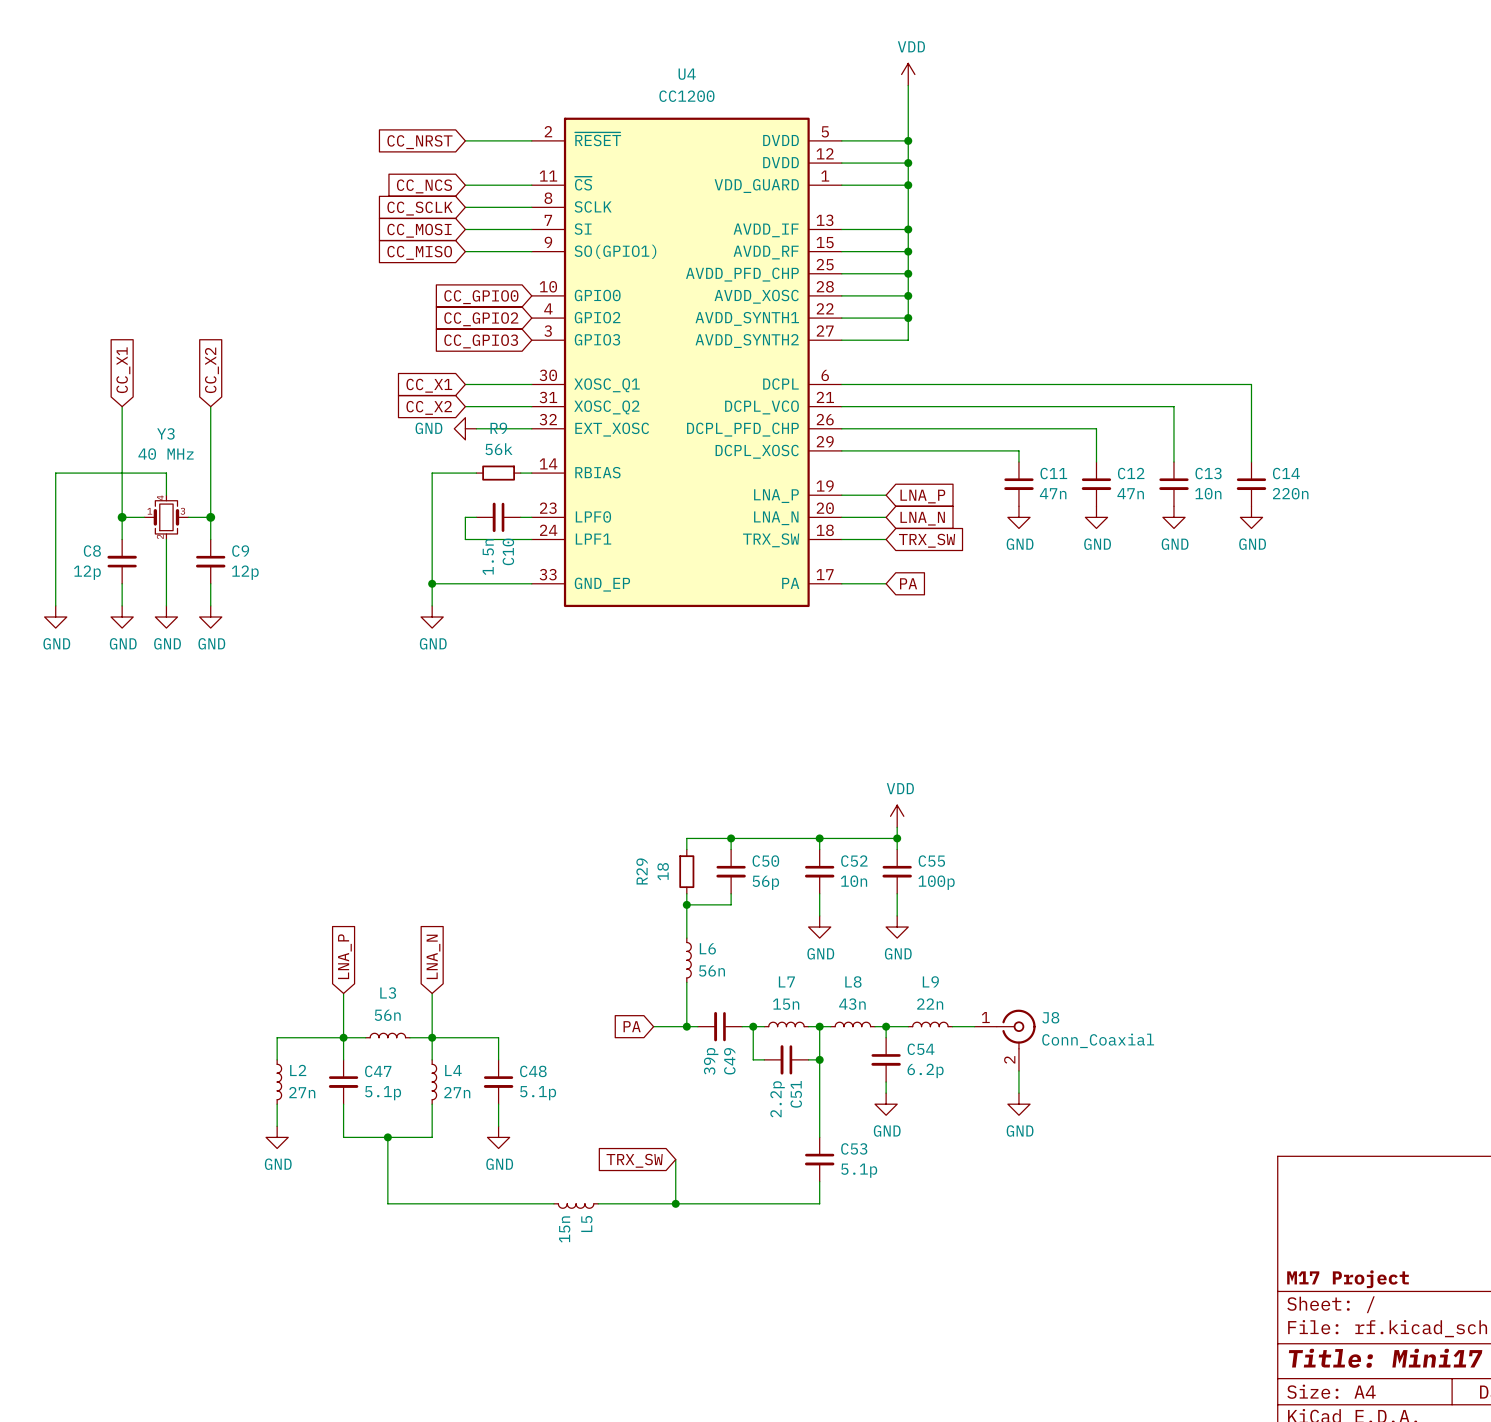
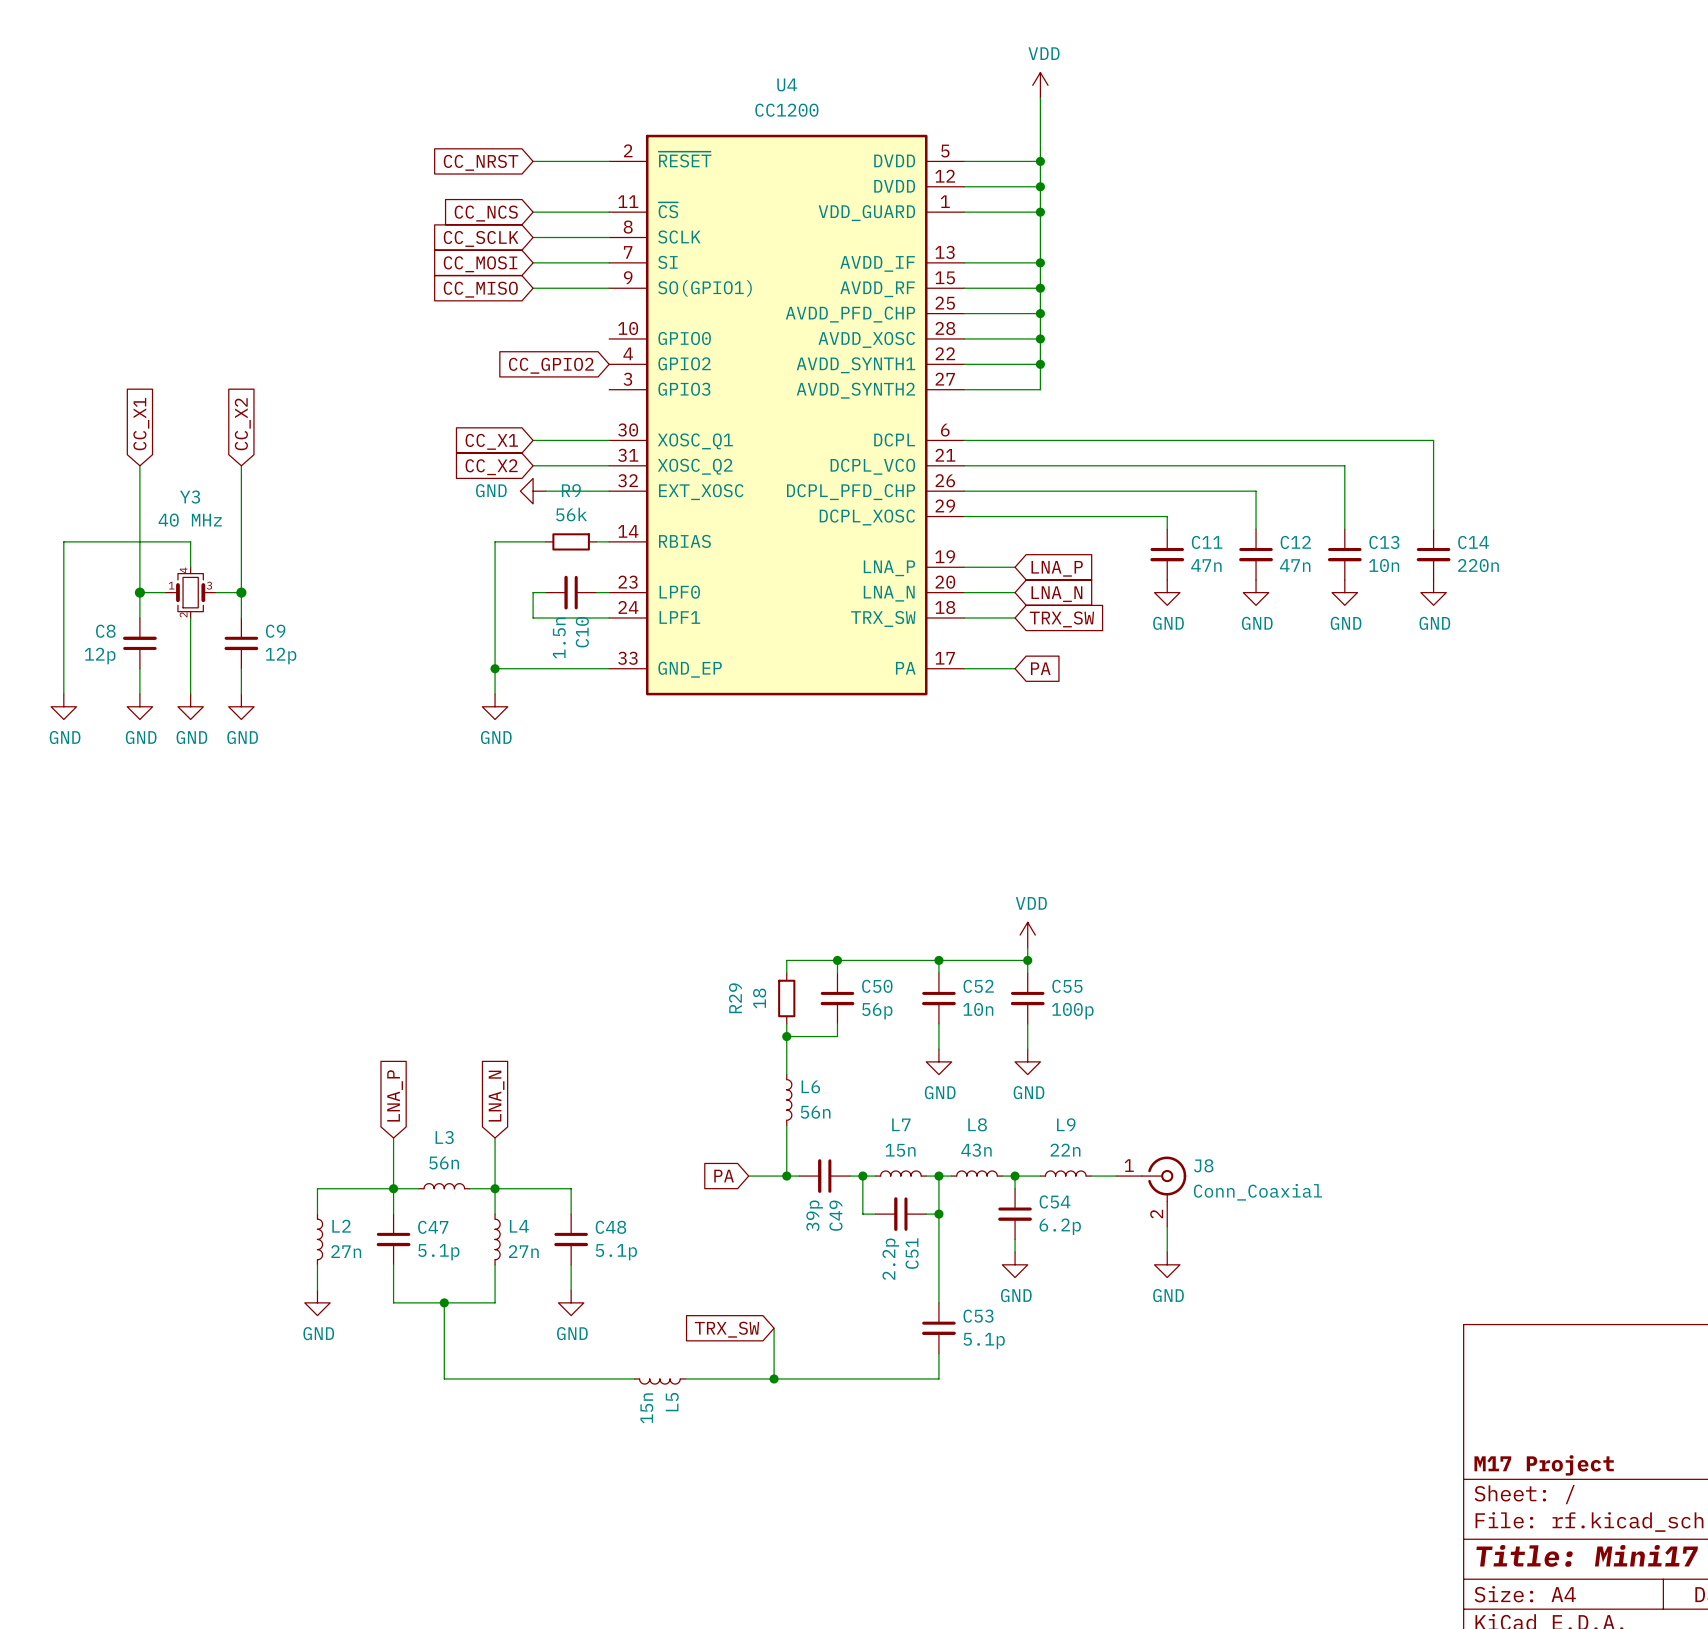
global label: CC_GPIO0 (481, 297) -> none
global label: CC_GPIO3 (481, 341) -> none

